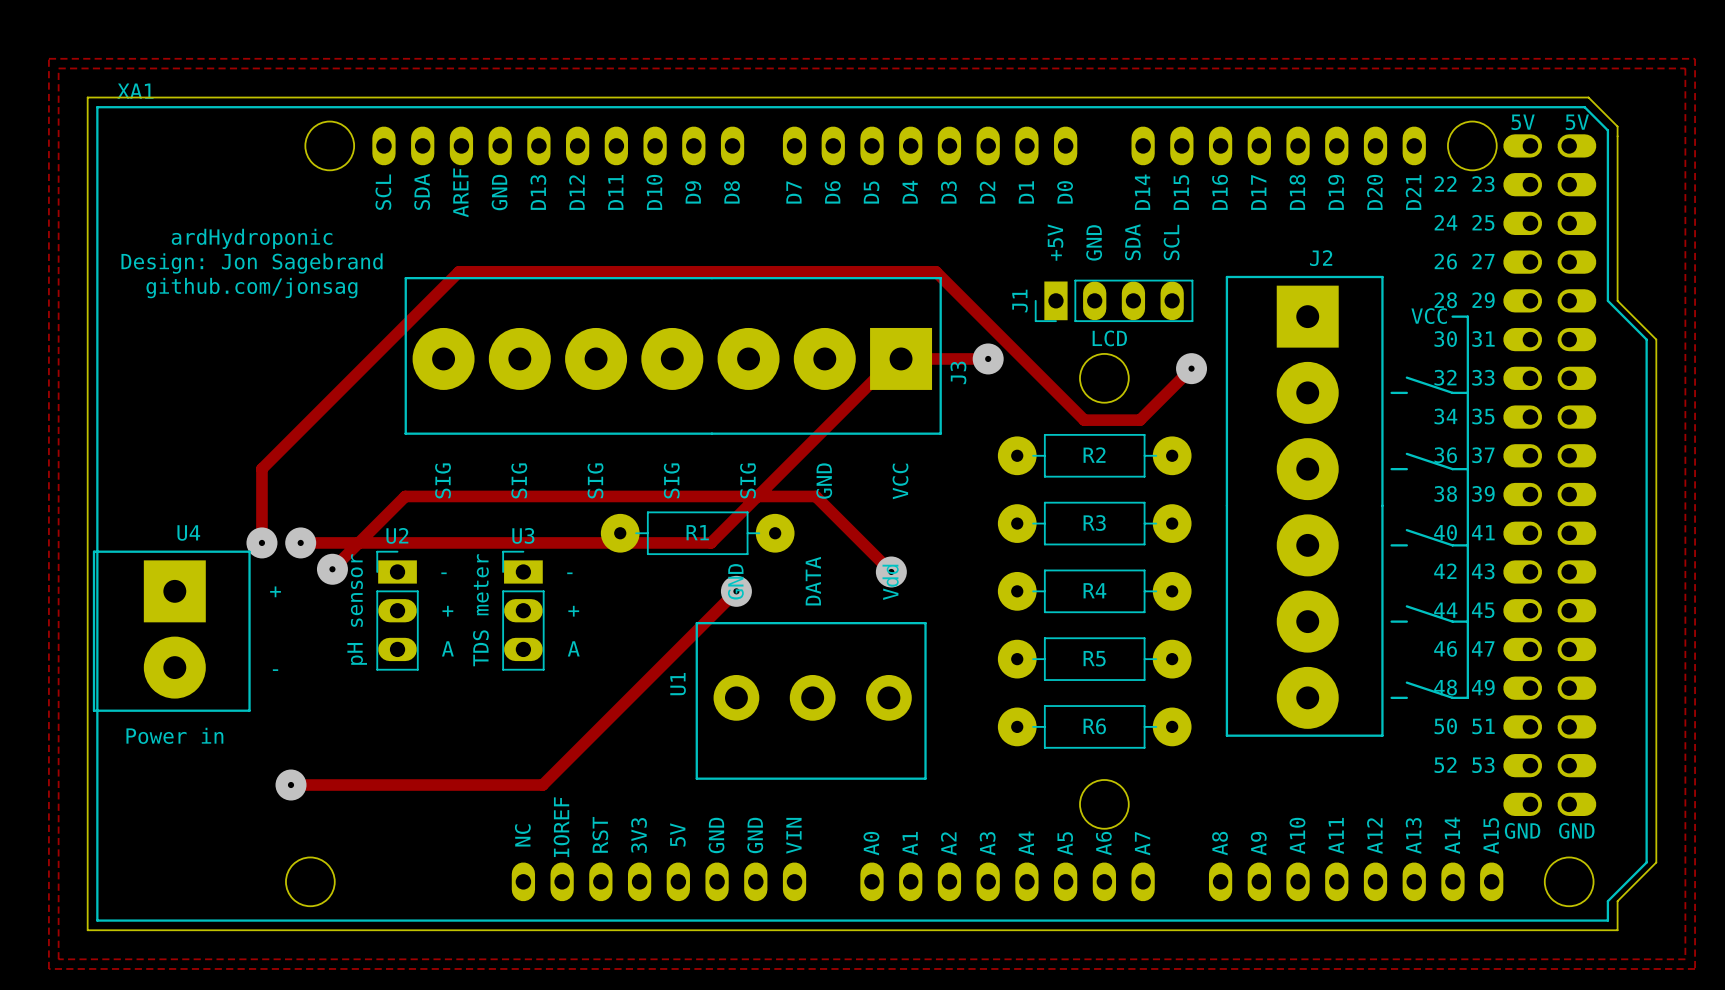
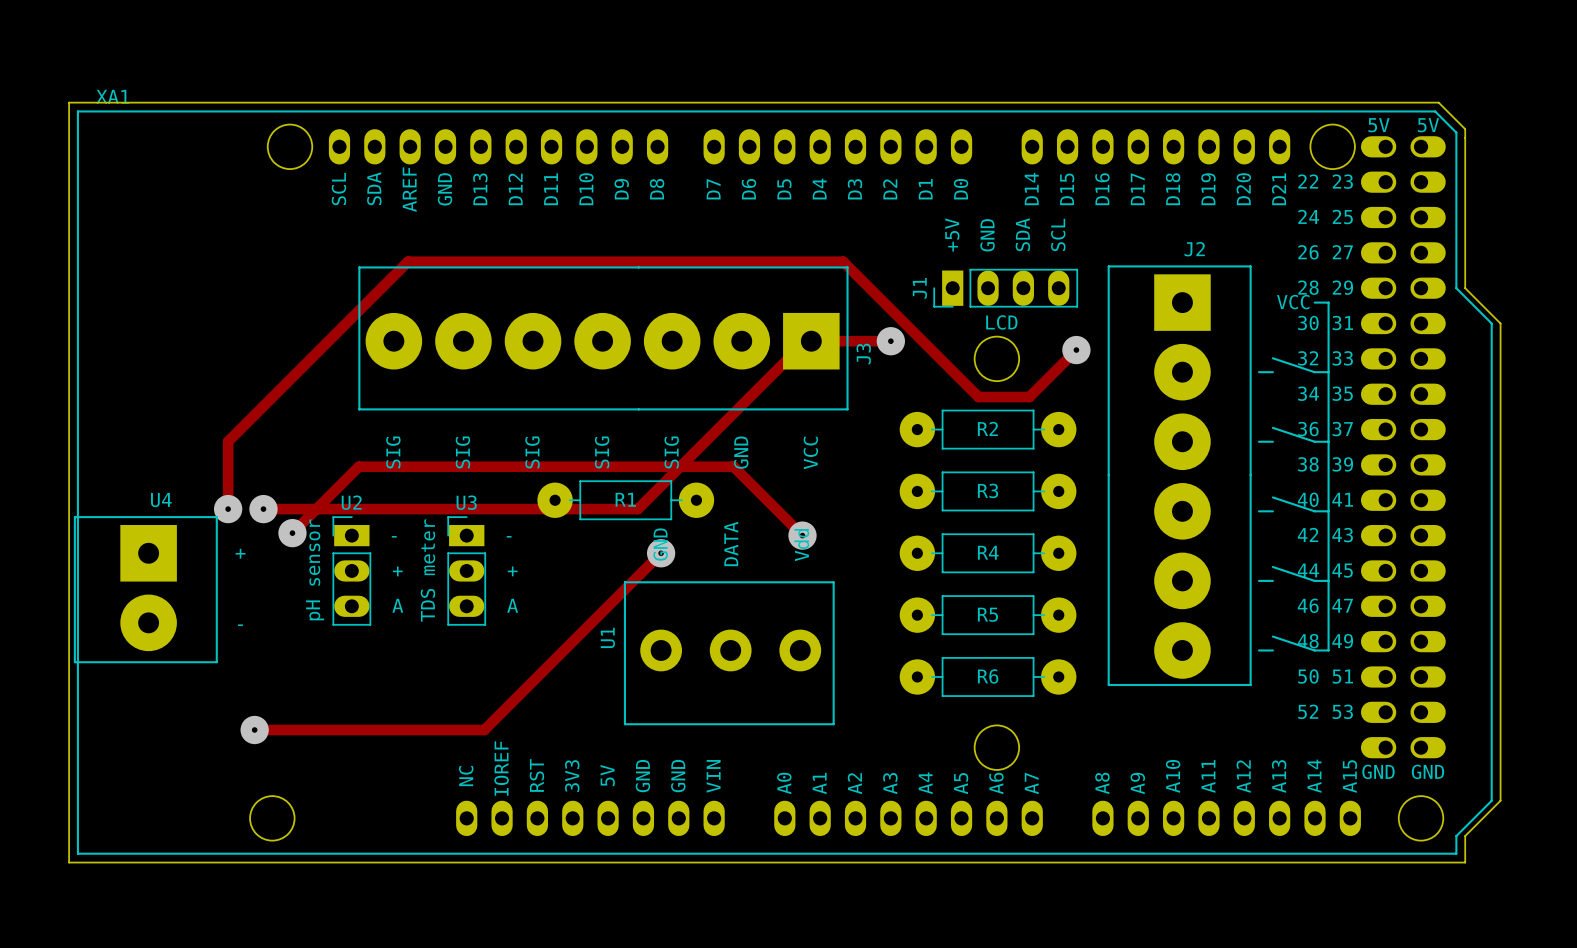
zone outline: (48, 58) (48, 968) (1695, 968) (1695, 58) (48, 58) -> none
zone outline: (58, 68) (58, 959) (1685, 959) (1685, 68) (58, 68) -> none
text: ardHydroponic (252, 238) -> none
text: Design: Jon Sagebrand (252, 263) -> none
text: github.com/jonsag (251, 288) -> none
text: Power in (174, 735) -> none

